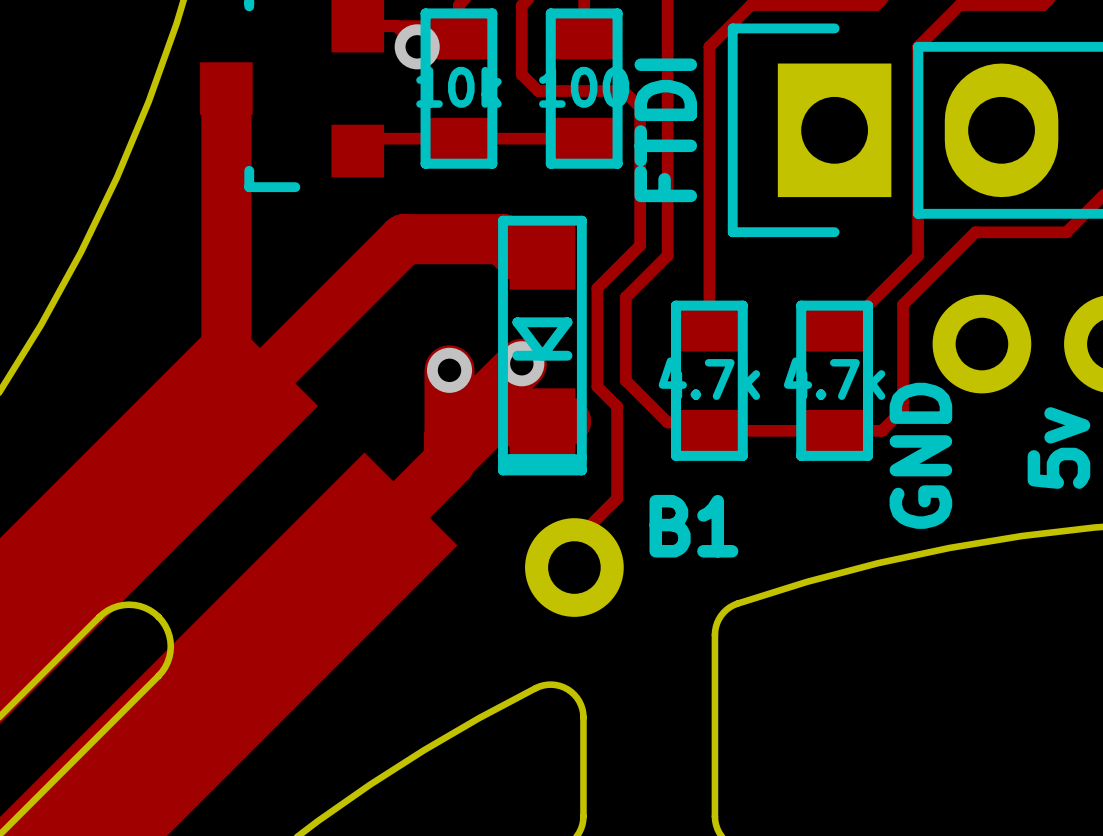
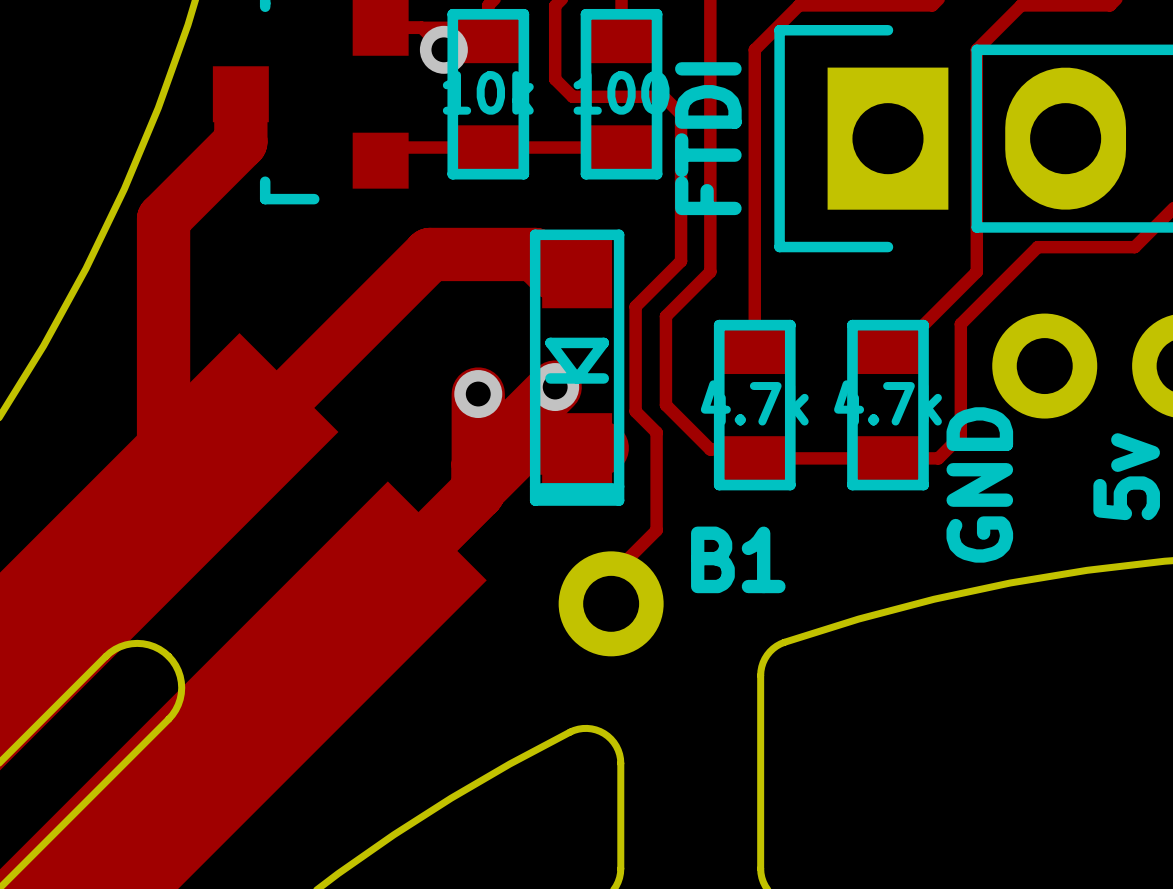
track: (226, 133) (226, 417) -> (240, 141) (163, 219) (163, 507) (91, 580)

